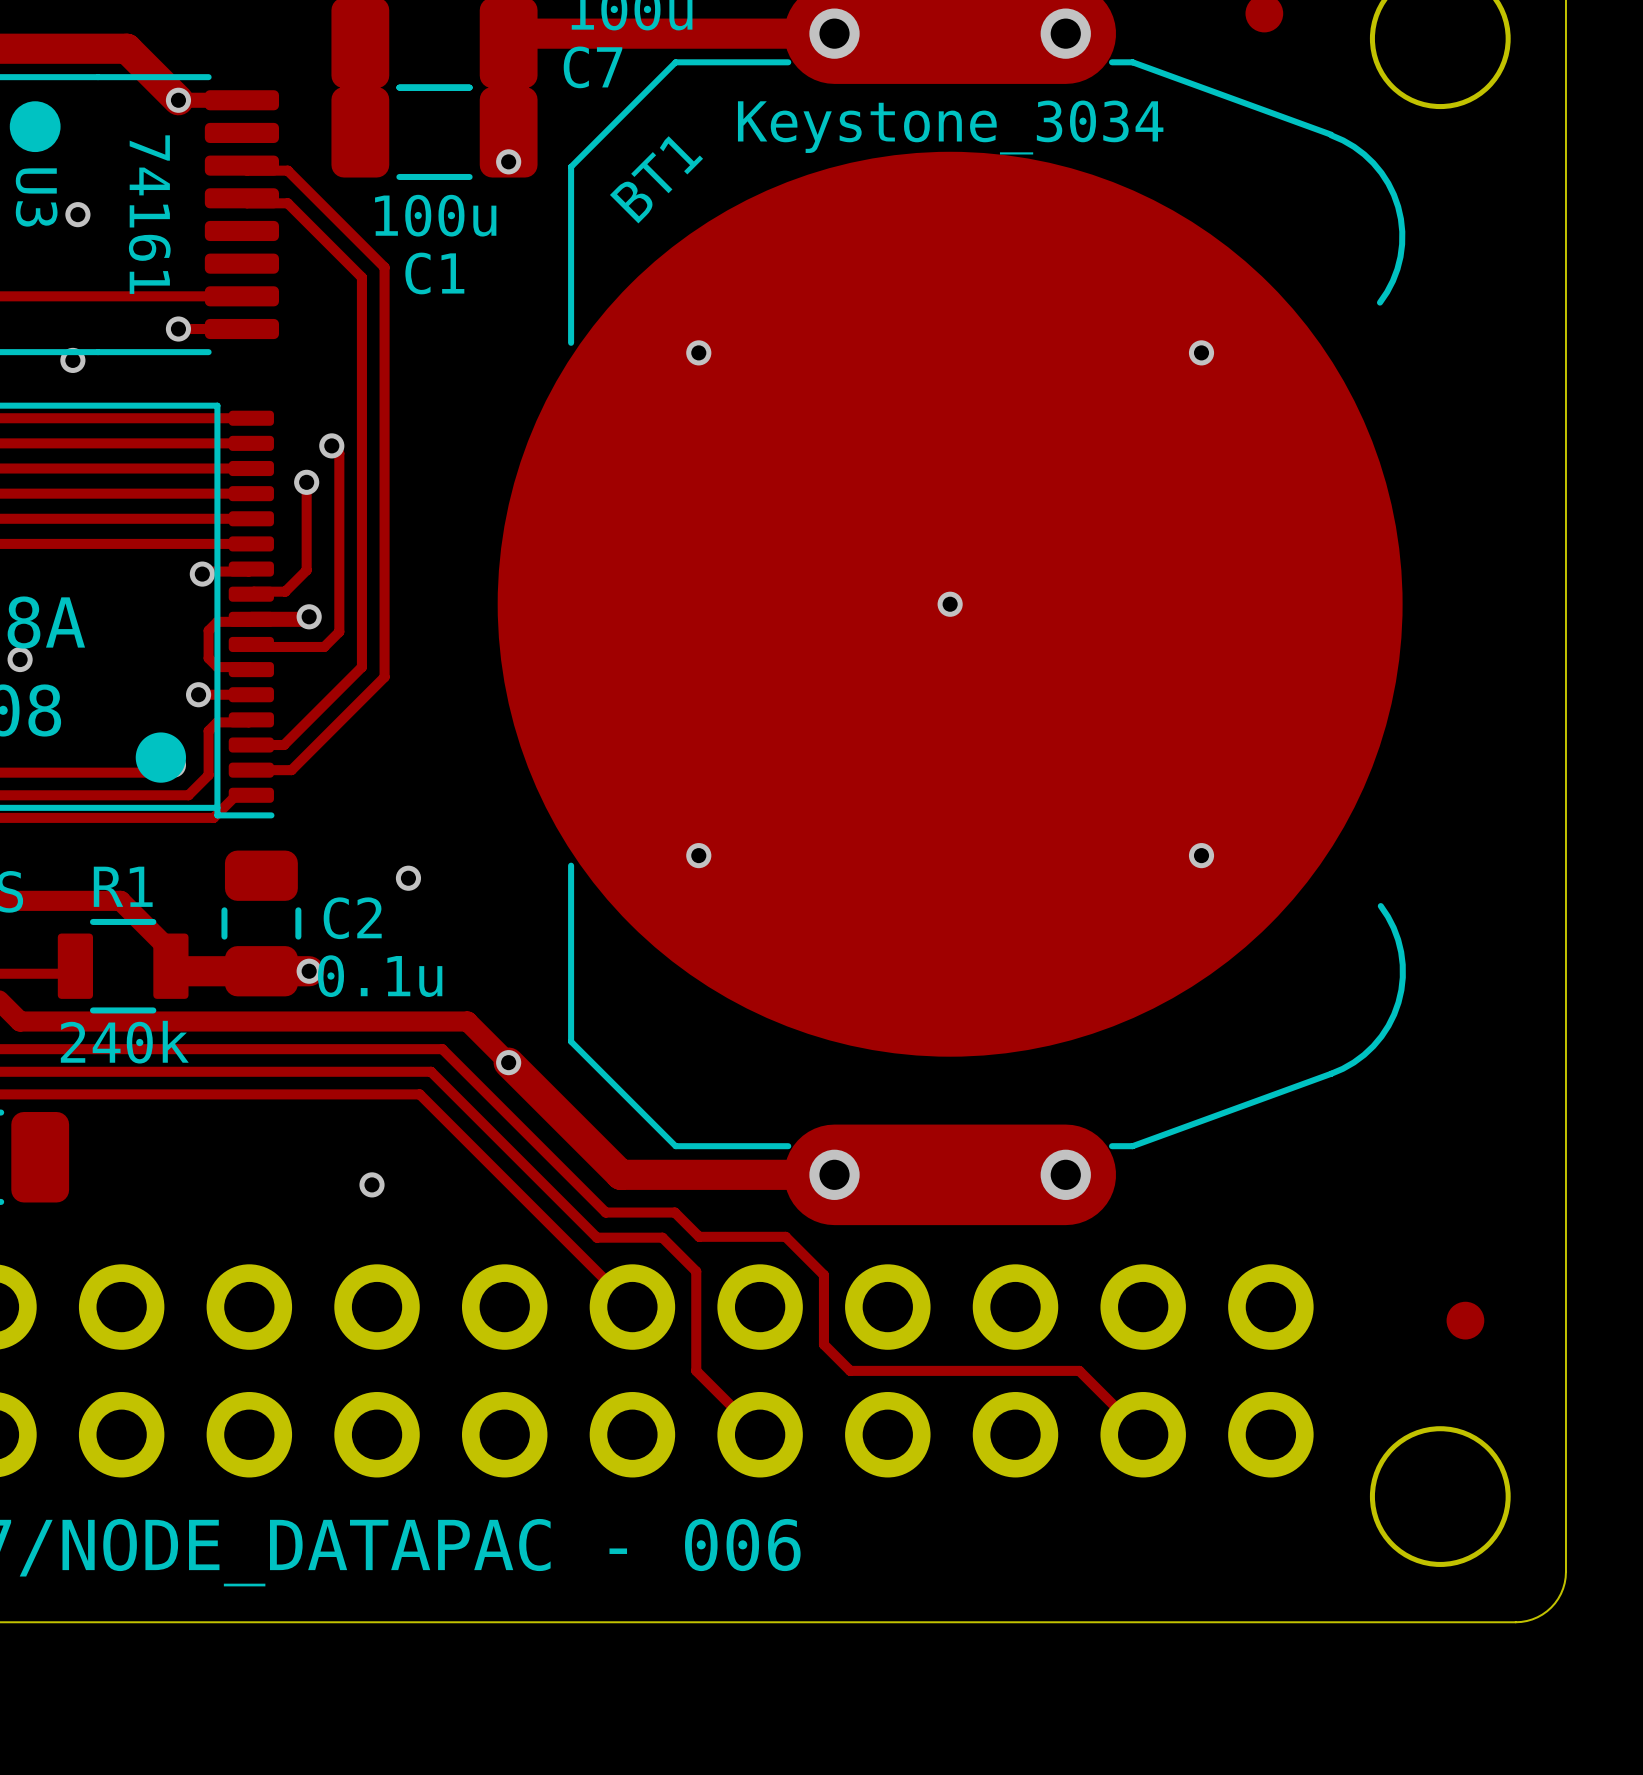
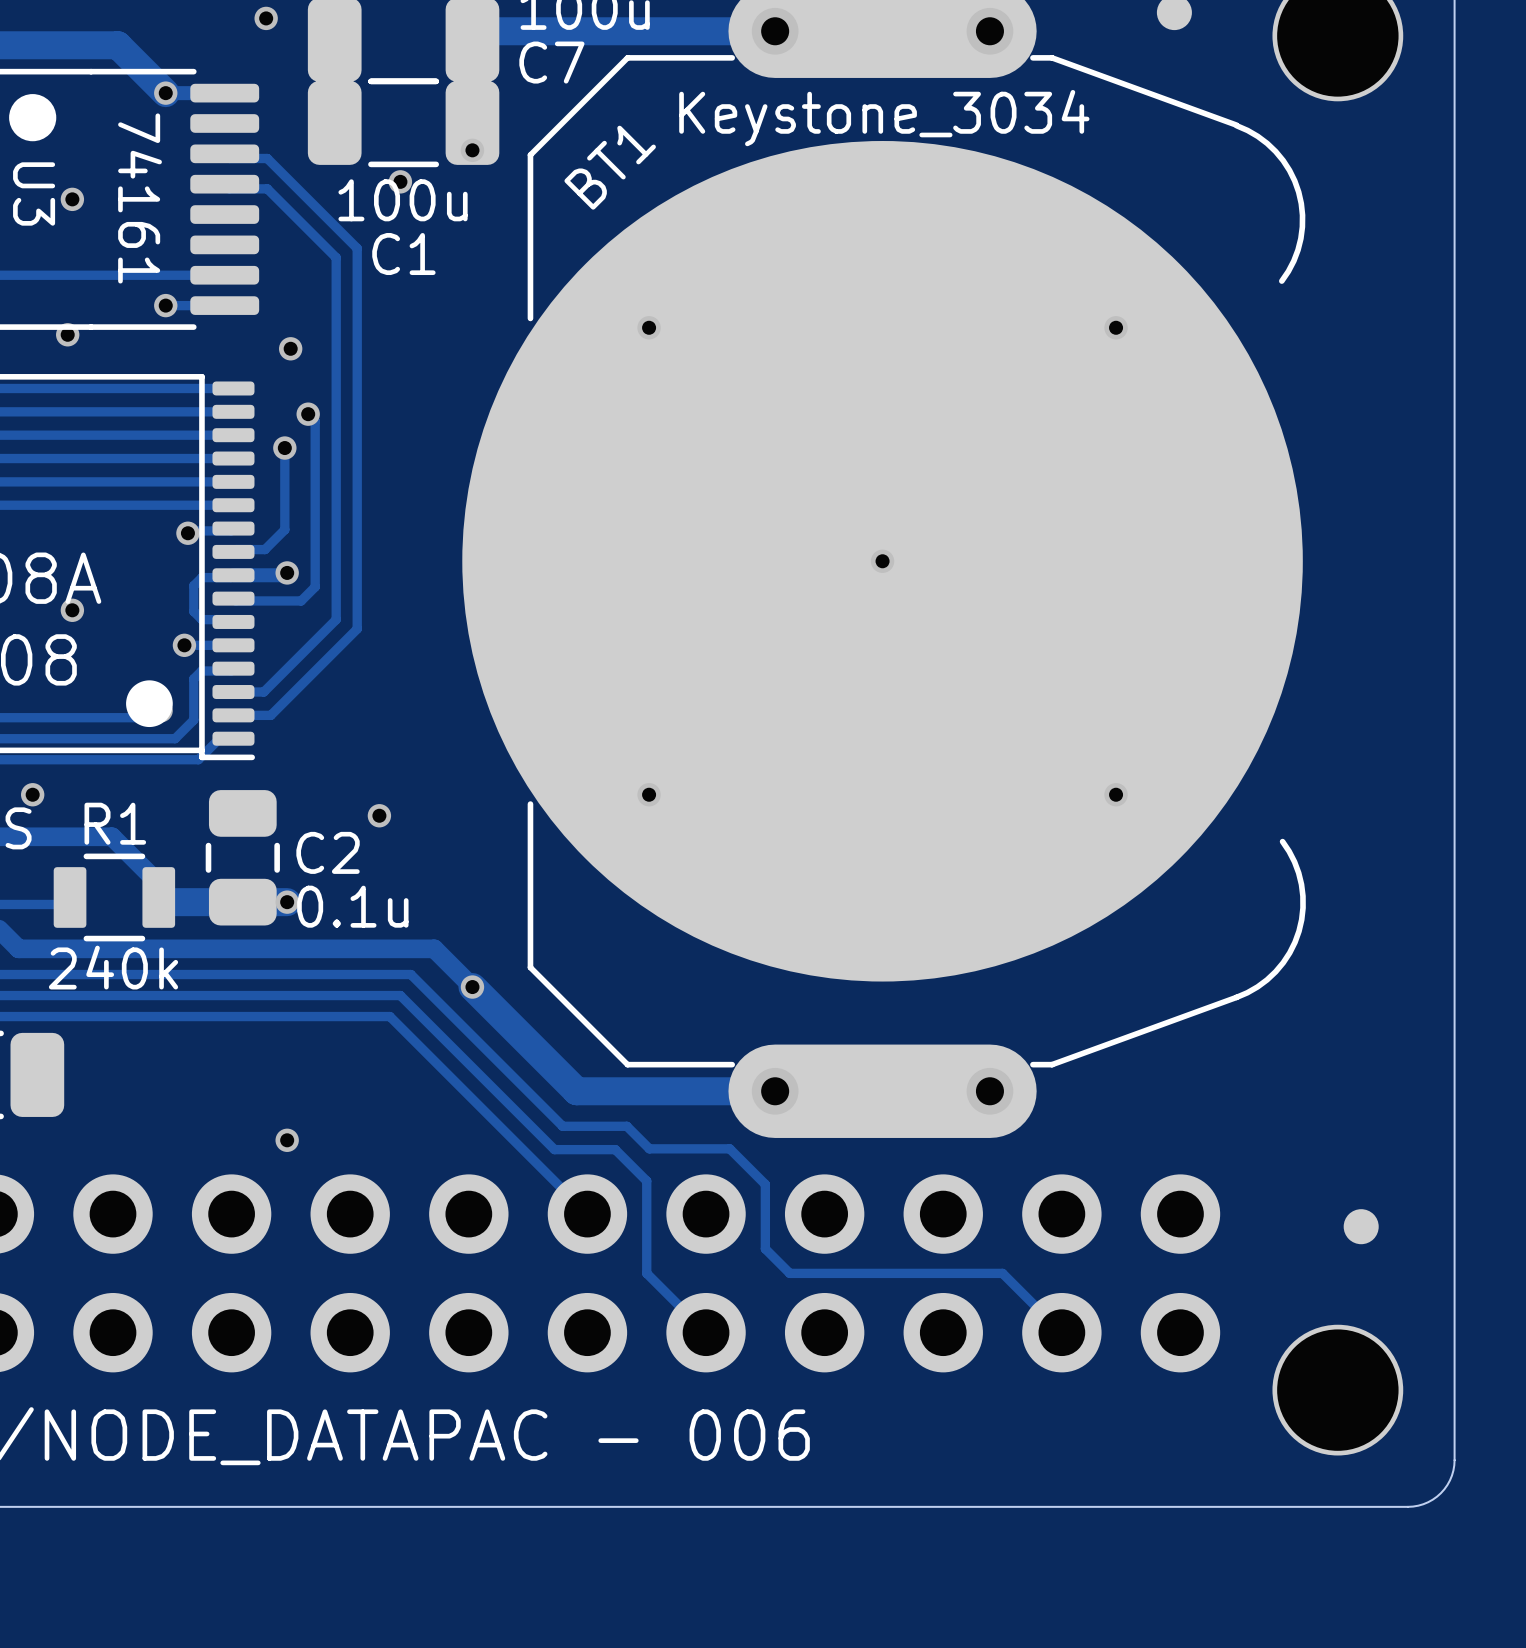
via: none -> (266, 18)
via: none -> (400, 181)
via: none -> (290, 348)
via position: (20, 659) -> (72, 610)
via: none -> (32, 794)
via position: (372, 1184) -> (287, 1140)

